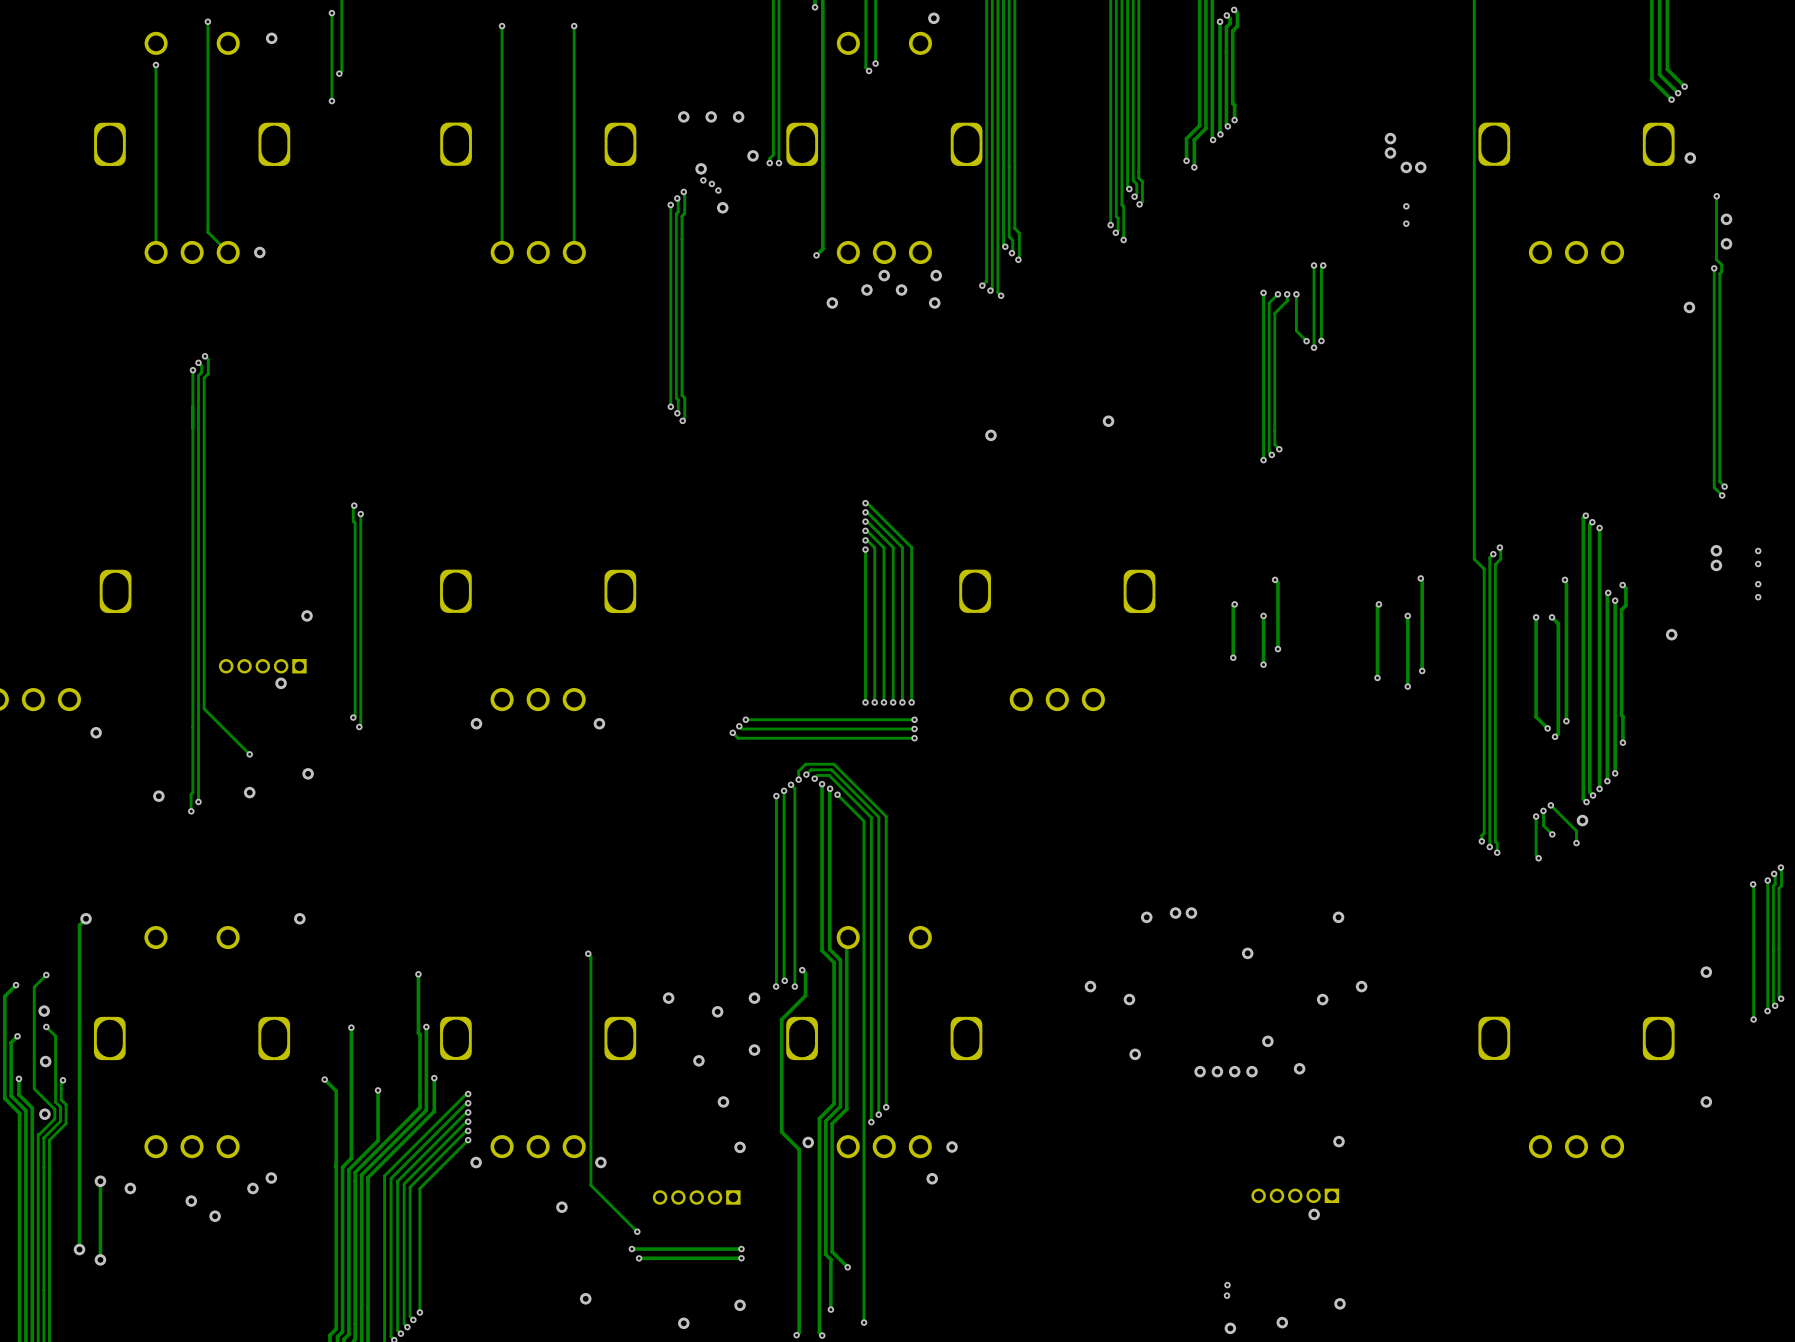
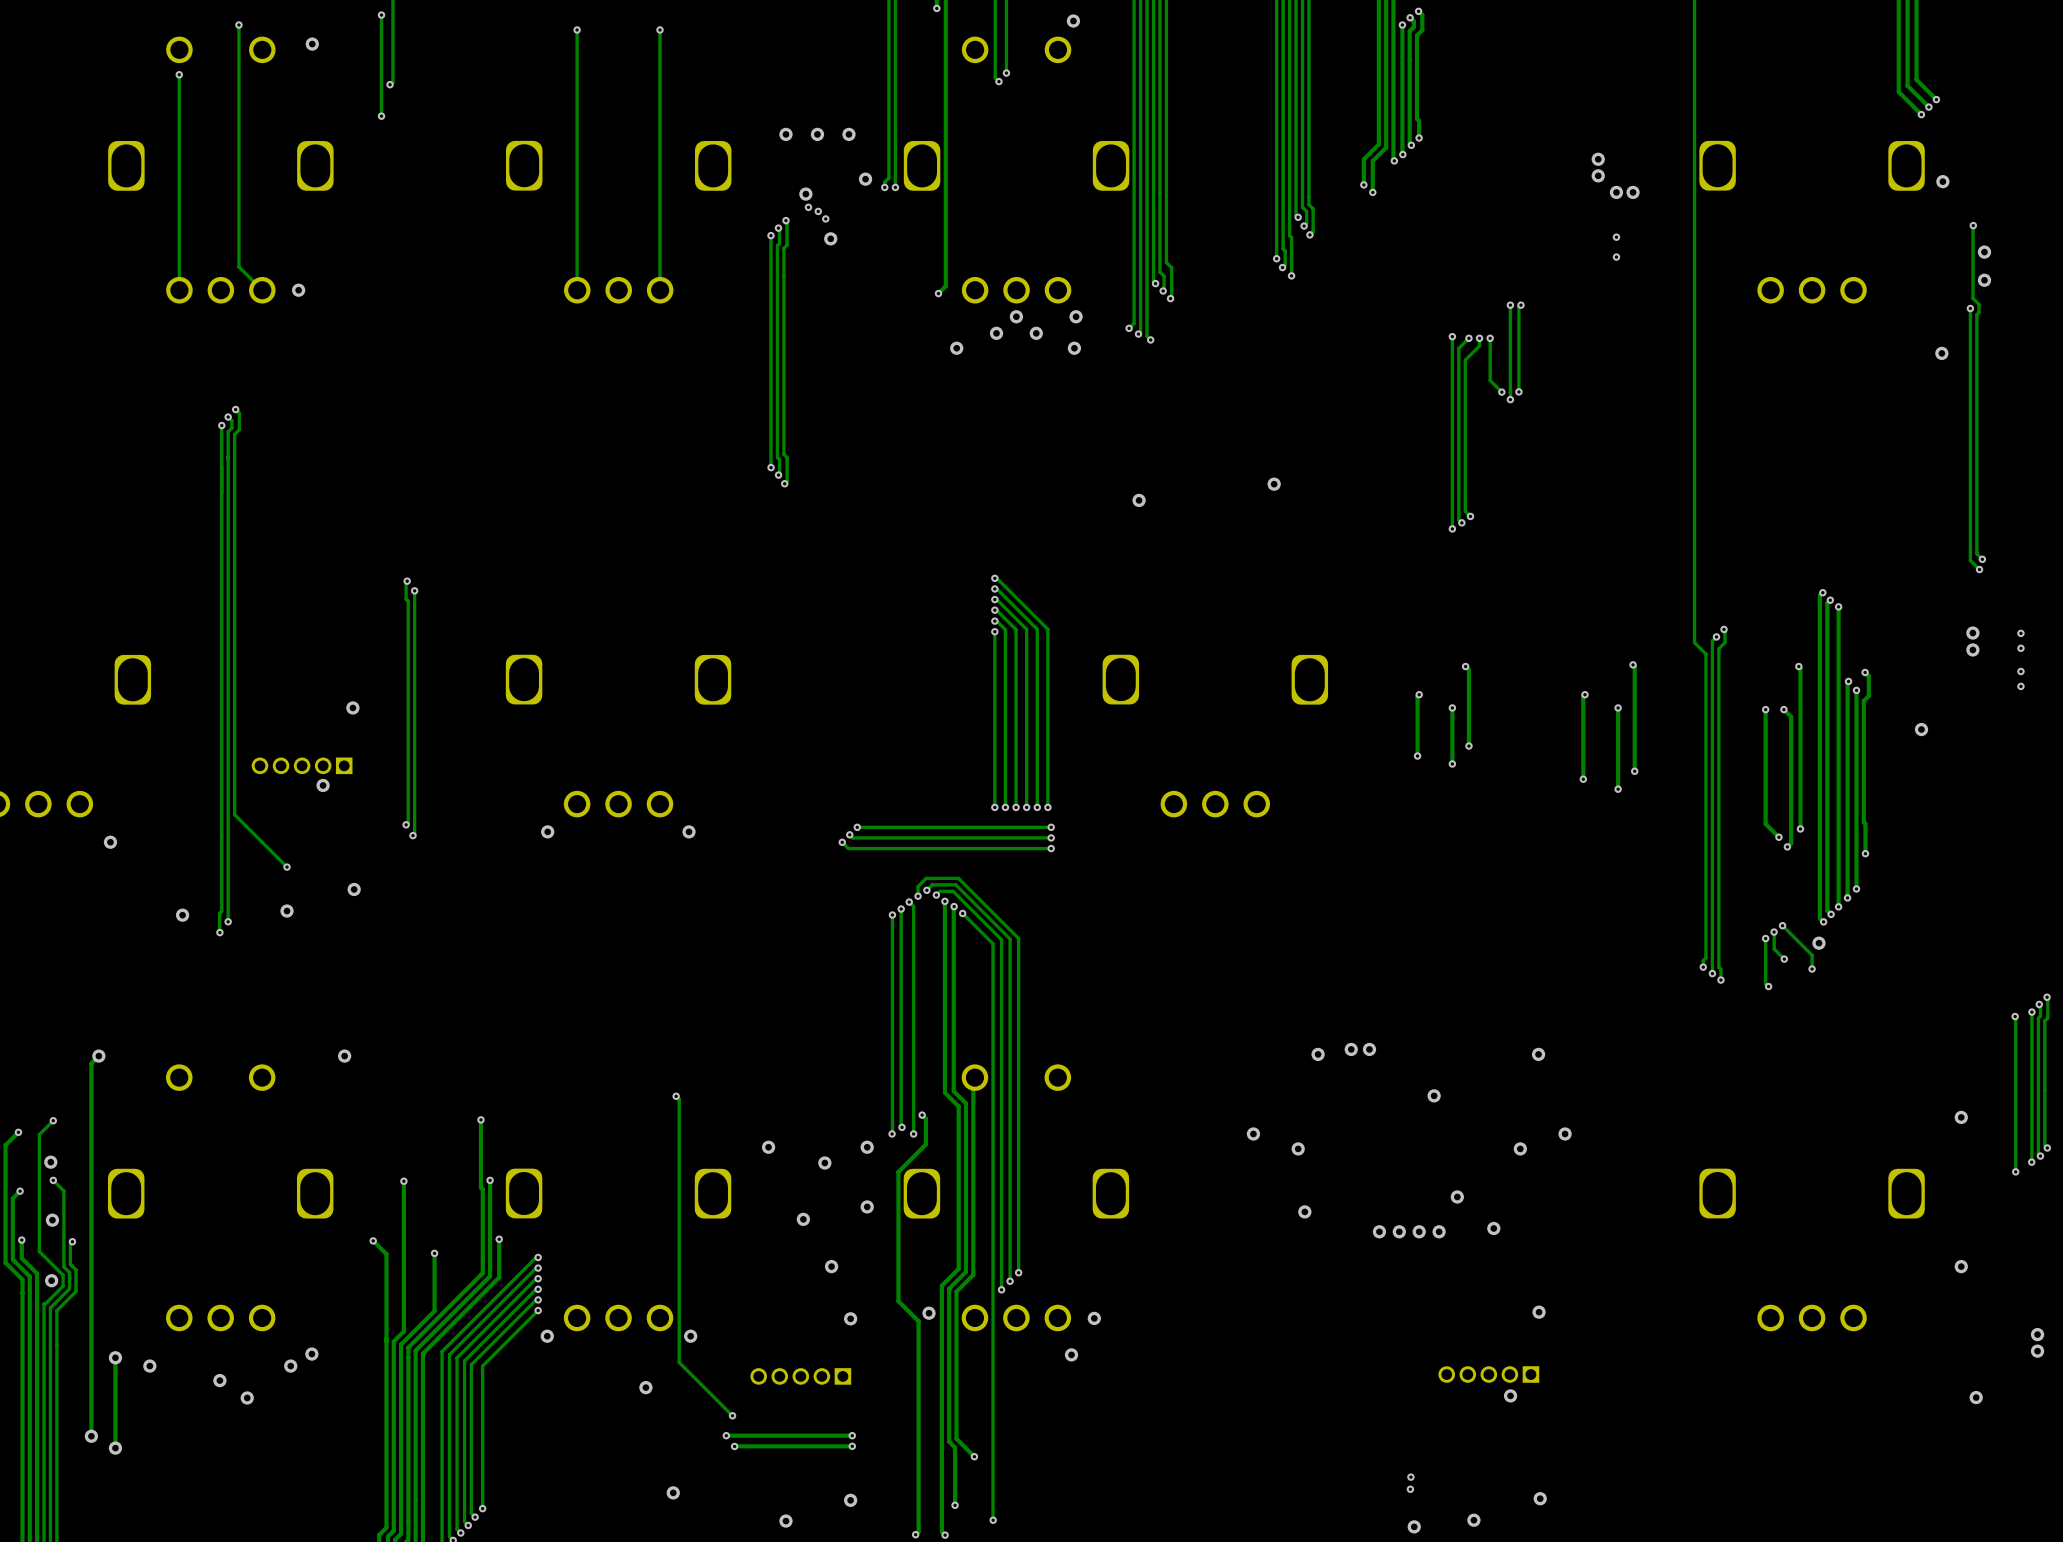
via: none -> (2037, 1334)
via: none -> (2037, 1351)
via: none -> (1976, 1397)

